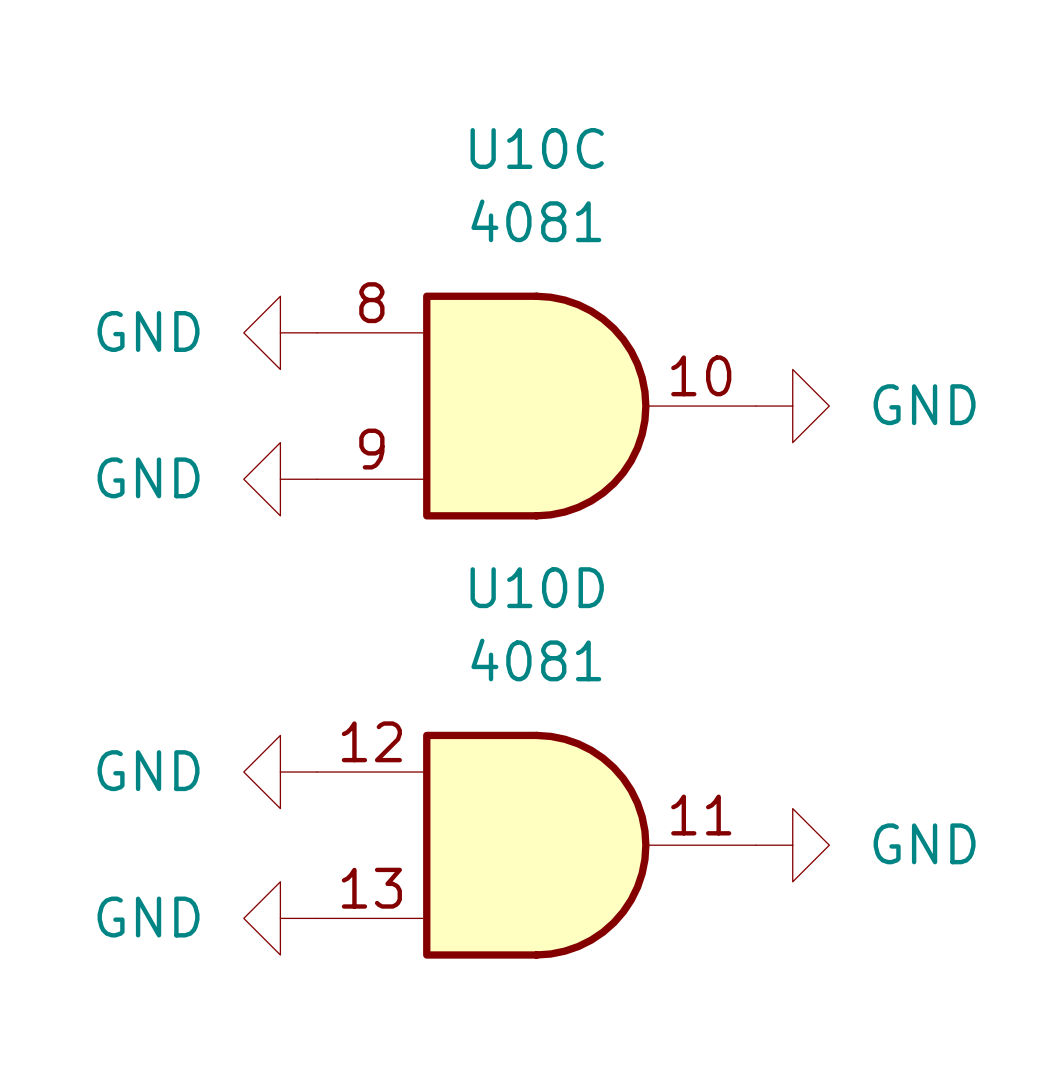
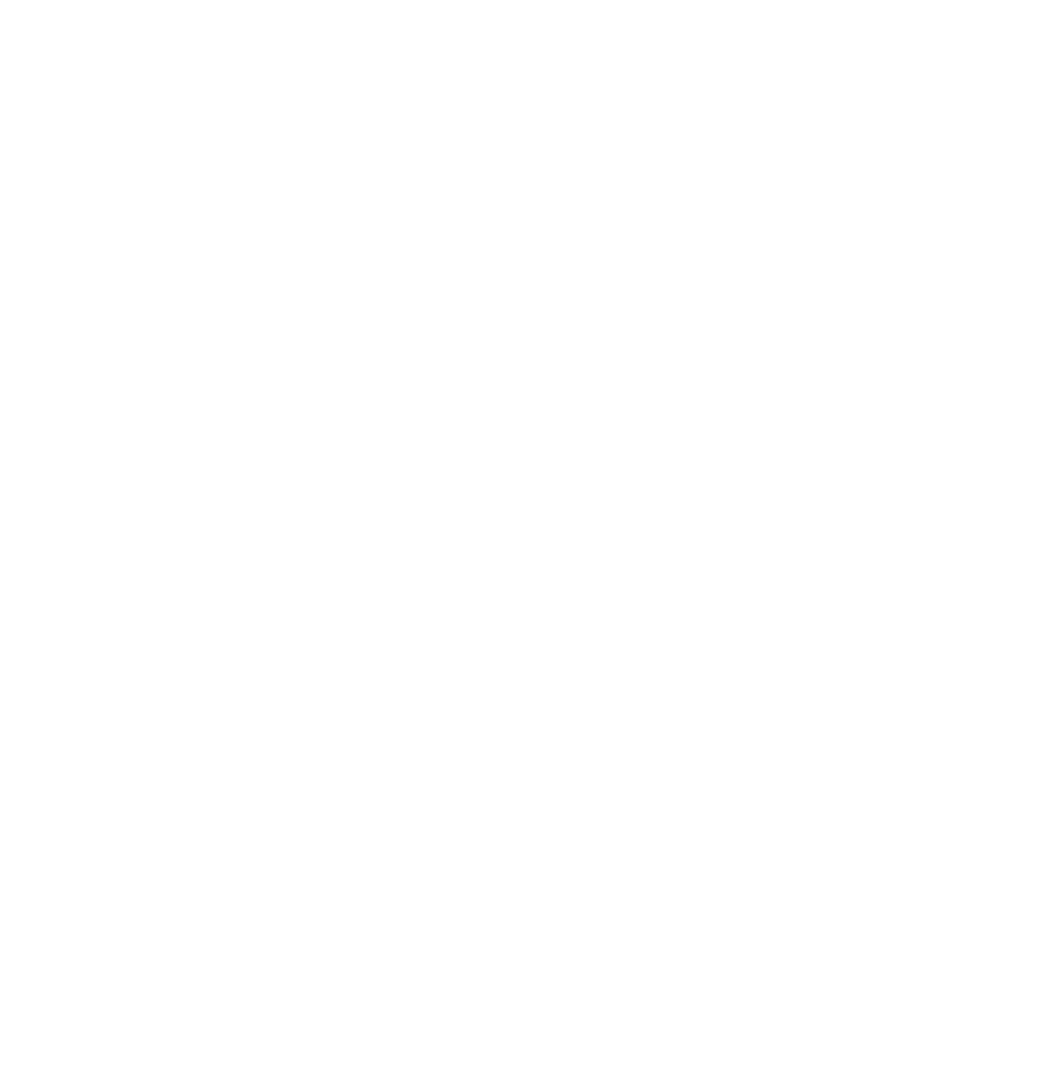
power symbol: GND (280, 332) -> none
U10C: 4081 (536, 406) -> none
power symbol: GND (792, 406) -> none
power symbol: GND (280, 479) -> none
power symbol: GND (280, 772) -> none
U10D: 4081 (536, 845) -> none
power symbol: GND (792, 845) -> none
power symbol: GND (280, 918) -> none

